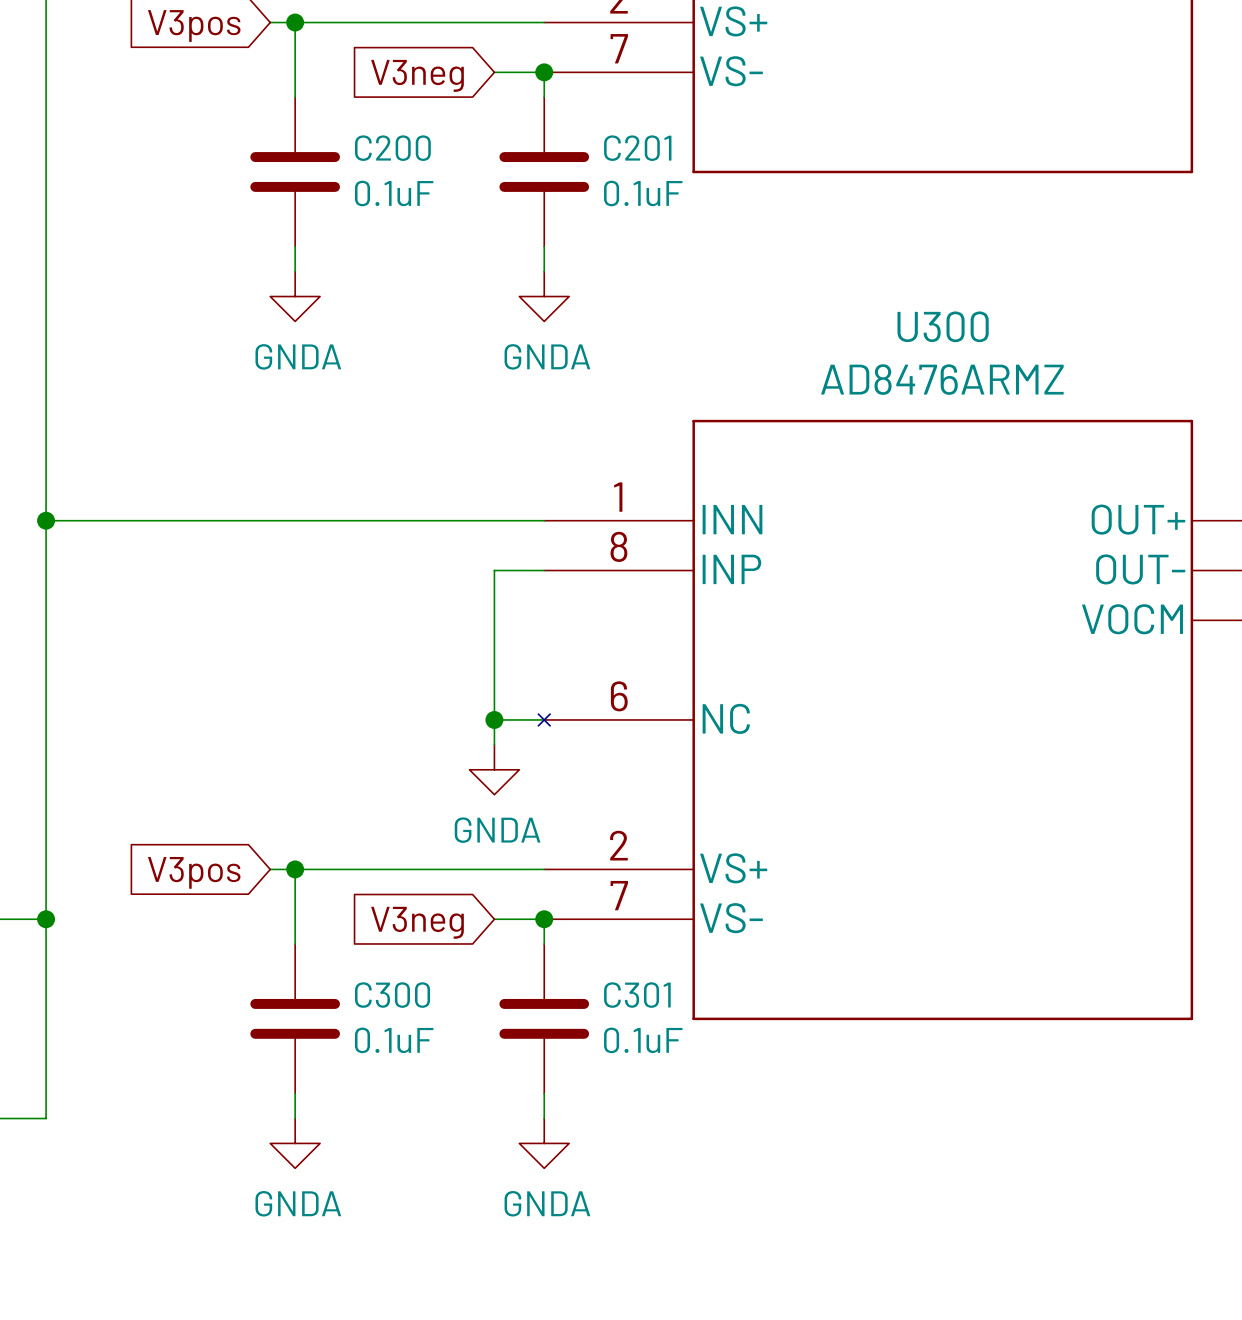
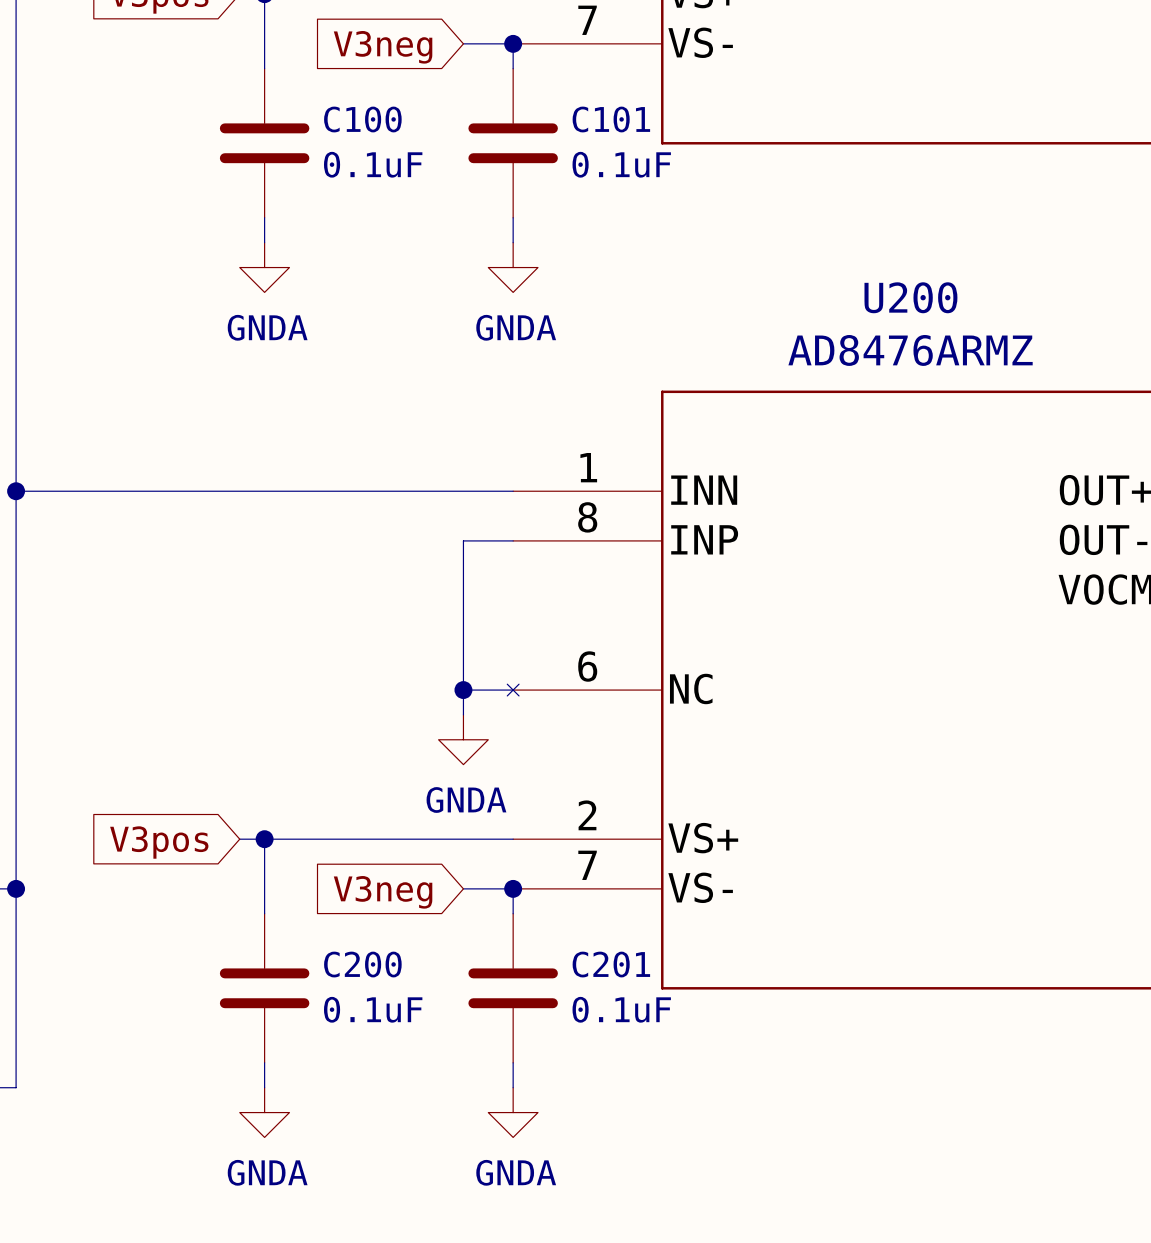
C200 name: C200 (392, 148) -> C100 (362, 119)
C201 name: C201 (637, 148) -> C101 (611, 119)
U300 name: U300 (943, 326) -> U200 (910, 297)
C300 name: C300 (392, 995) -> C200 (362, 964)
C301 name: C301 (637, 995) -> C201 (611, 964)

